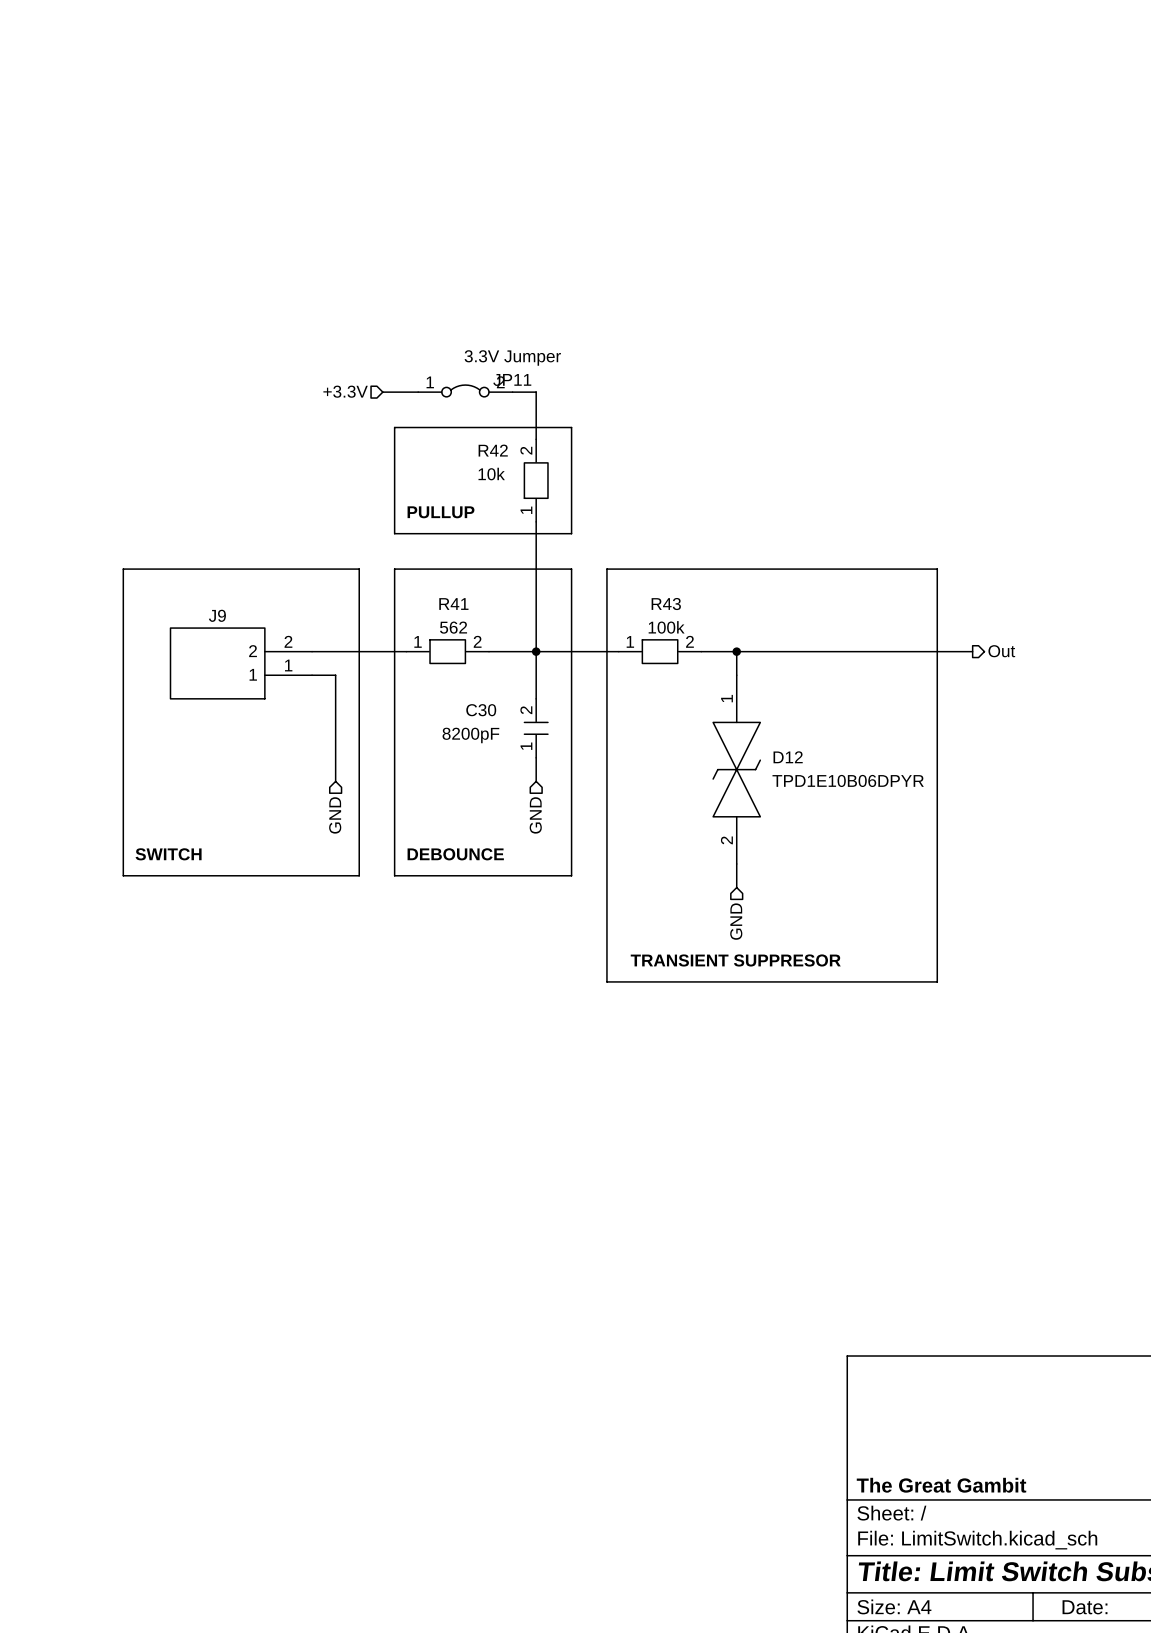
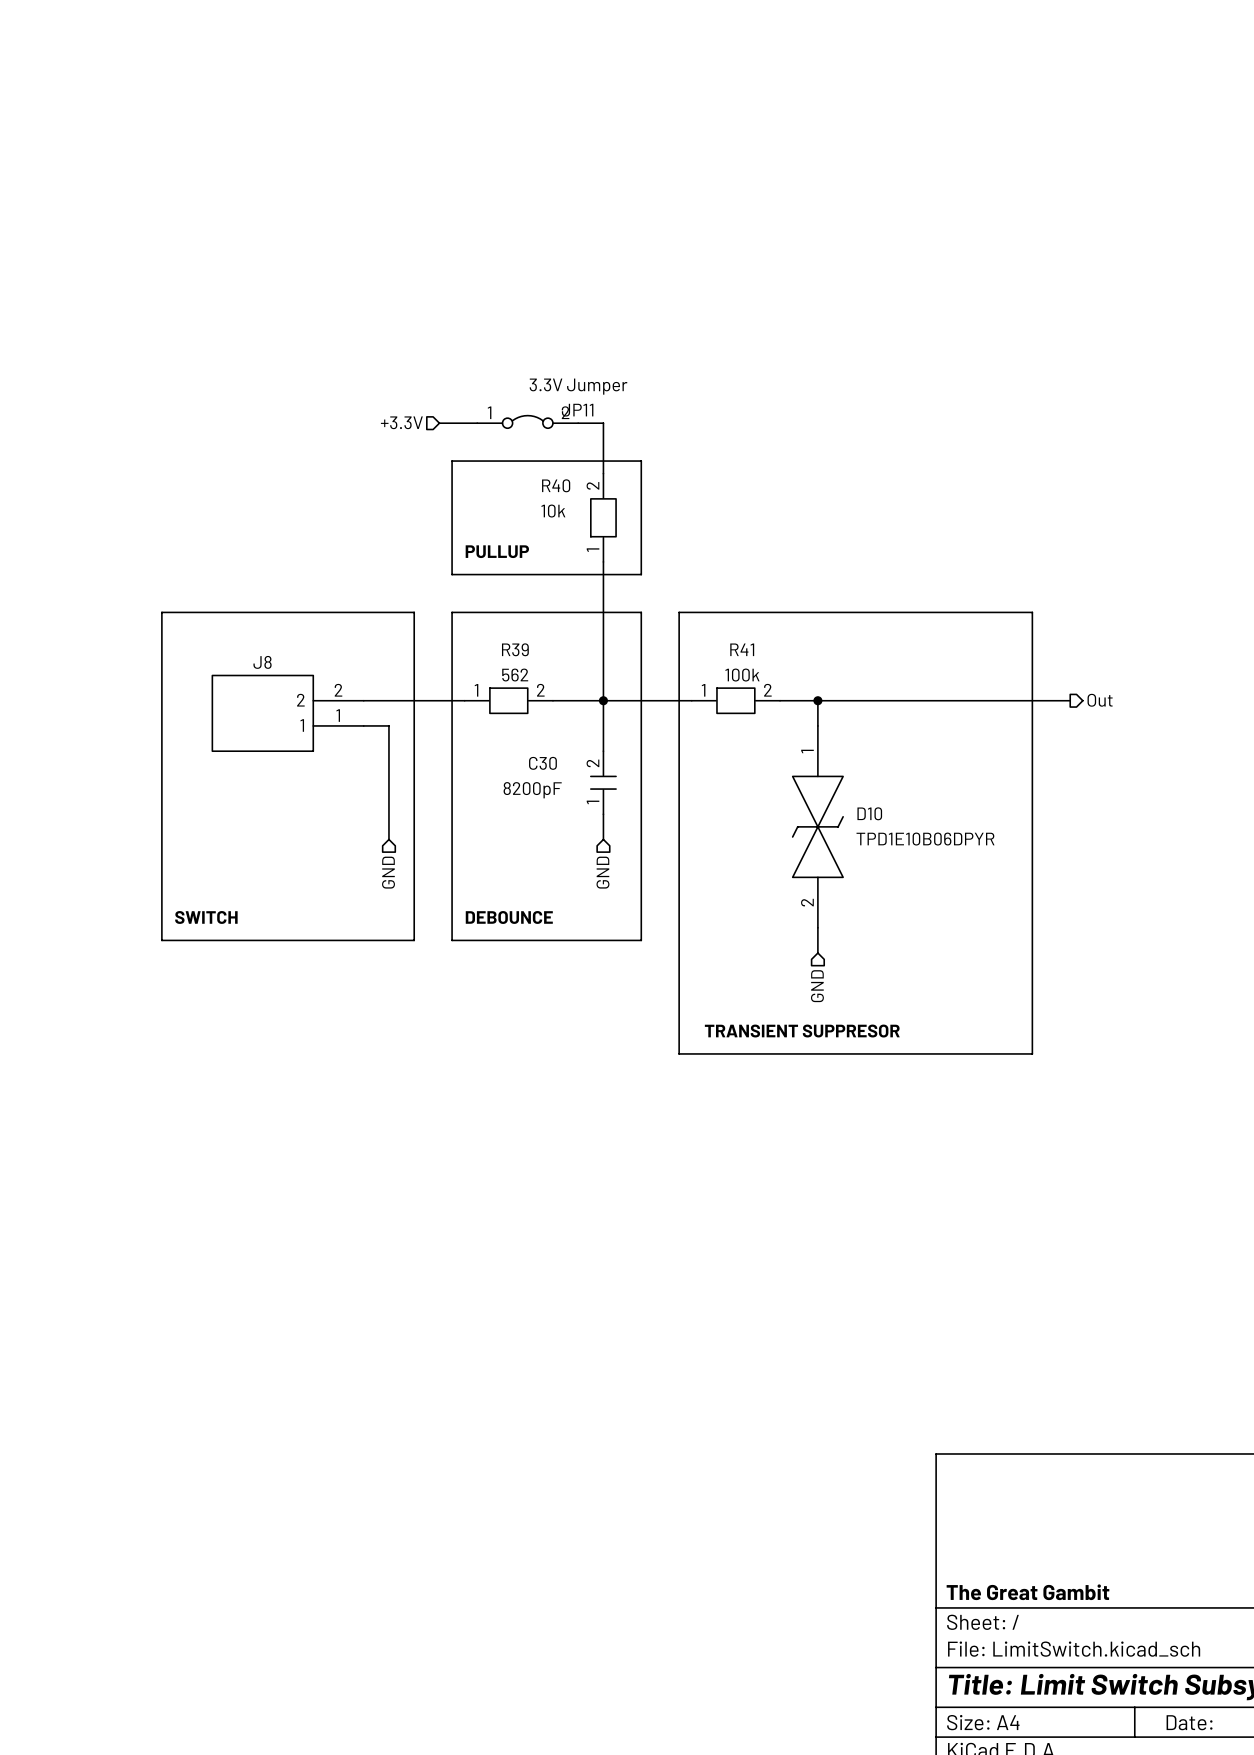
R42 name: R42 (493, 450) -> R40 (556, 485)
R41 name: R41 (453, 604) -> R39 (515, 649)
R43 name: R43 (666, 604) -> R41 (742, 649)
J9 name: J9 (217, 615) -> J8 (262, 662)
D12 name: D12 (788, 757) -> D10 (869, 813)

